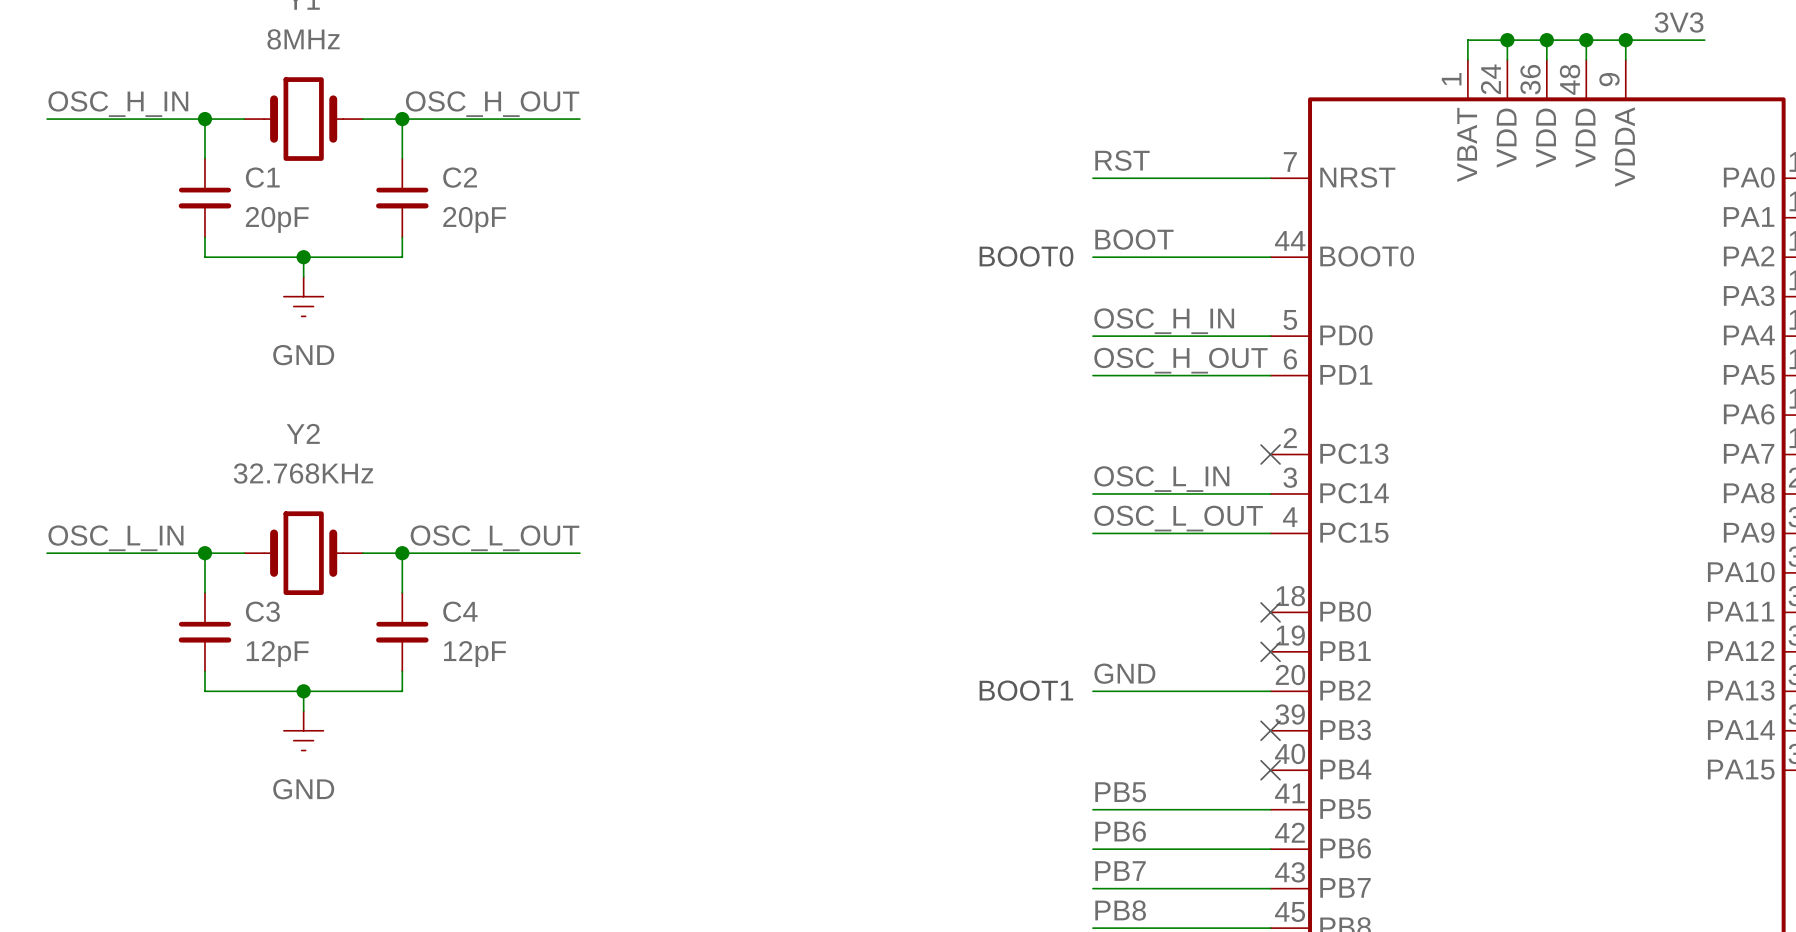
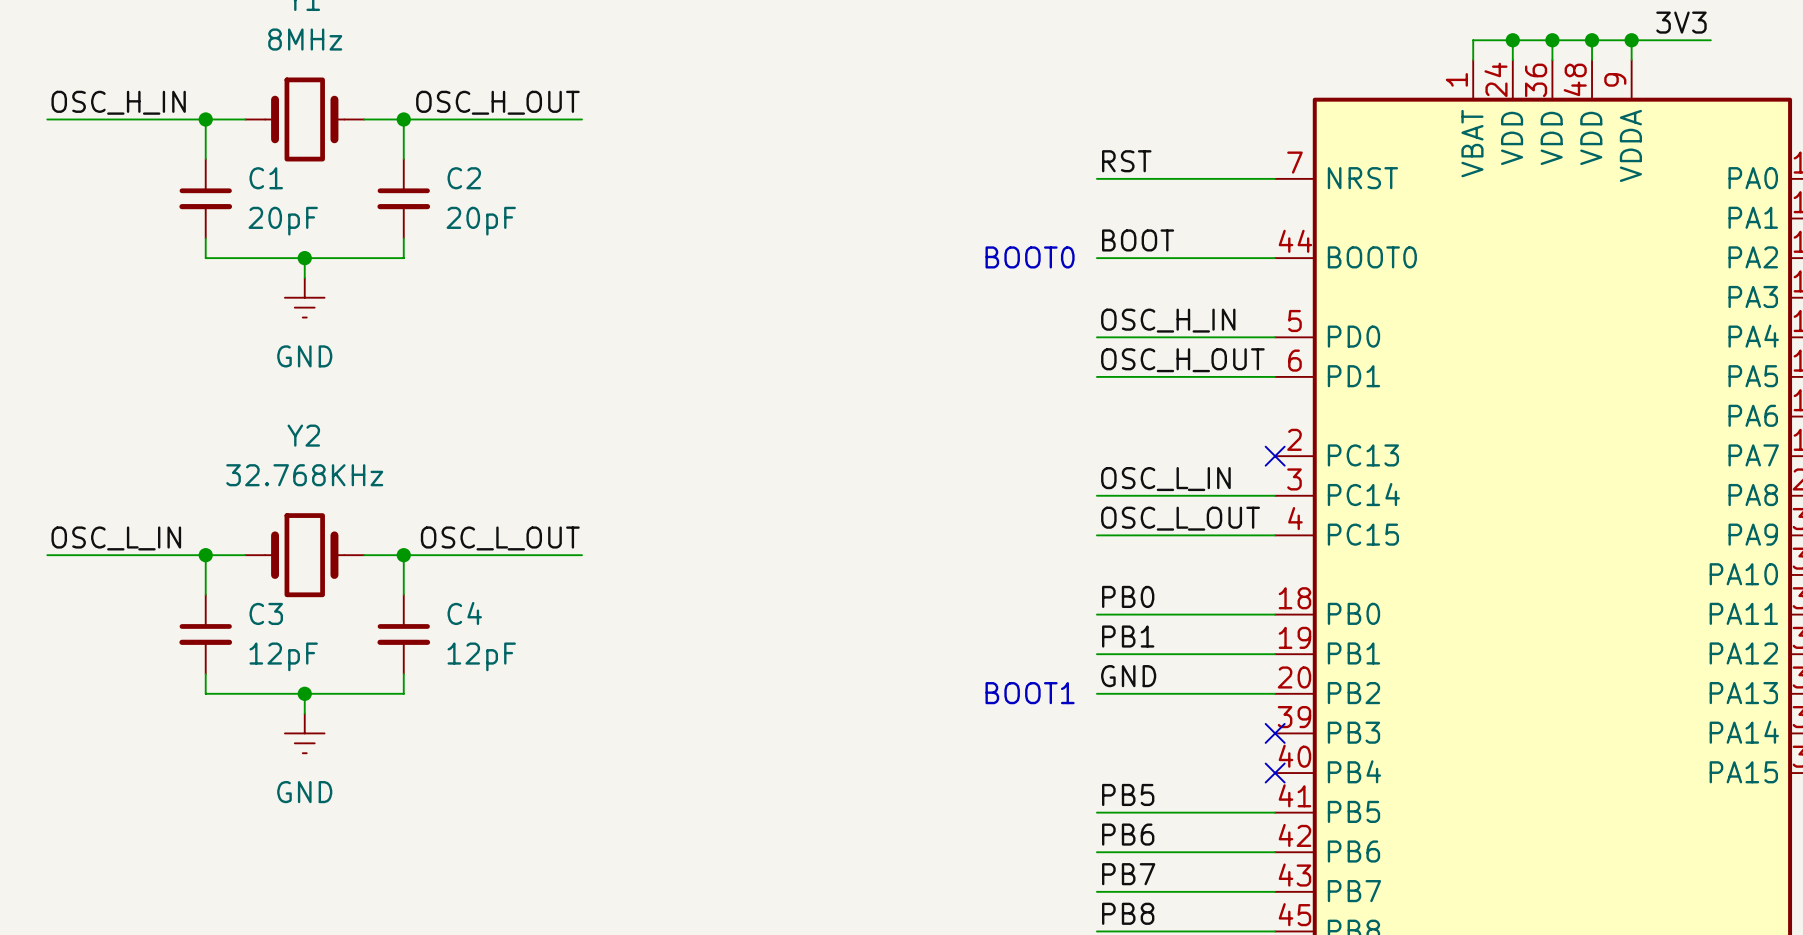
label: none -> PB0 (1128, 596)
wire: none -> (1096, 614) (1275, 614)
no-connect mark: (1270, 612) -> none
label: none -> PB1 (1128, 636)
wire: none -> (1096, 654) (1275, 654)
no-connect mark: (1270, 651) -> none

